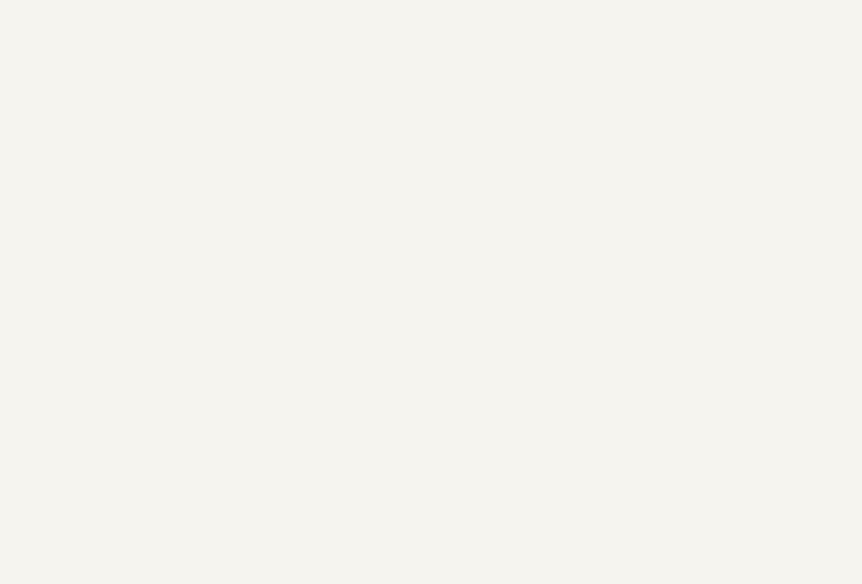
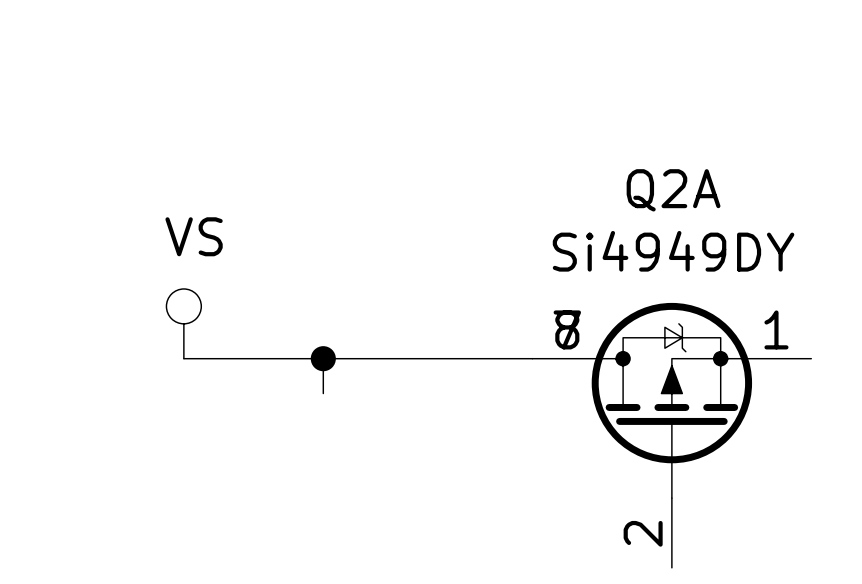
power symbol: none -> VS (183, 323)
wire: none -> (183, 358) (532, 358)
wire: none -> (323, 358) (323, 393)
junction: none -> (323, 358)
Q2A: none -> Si4949DY (671, 435)

